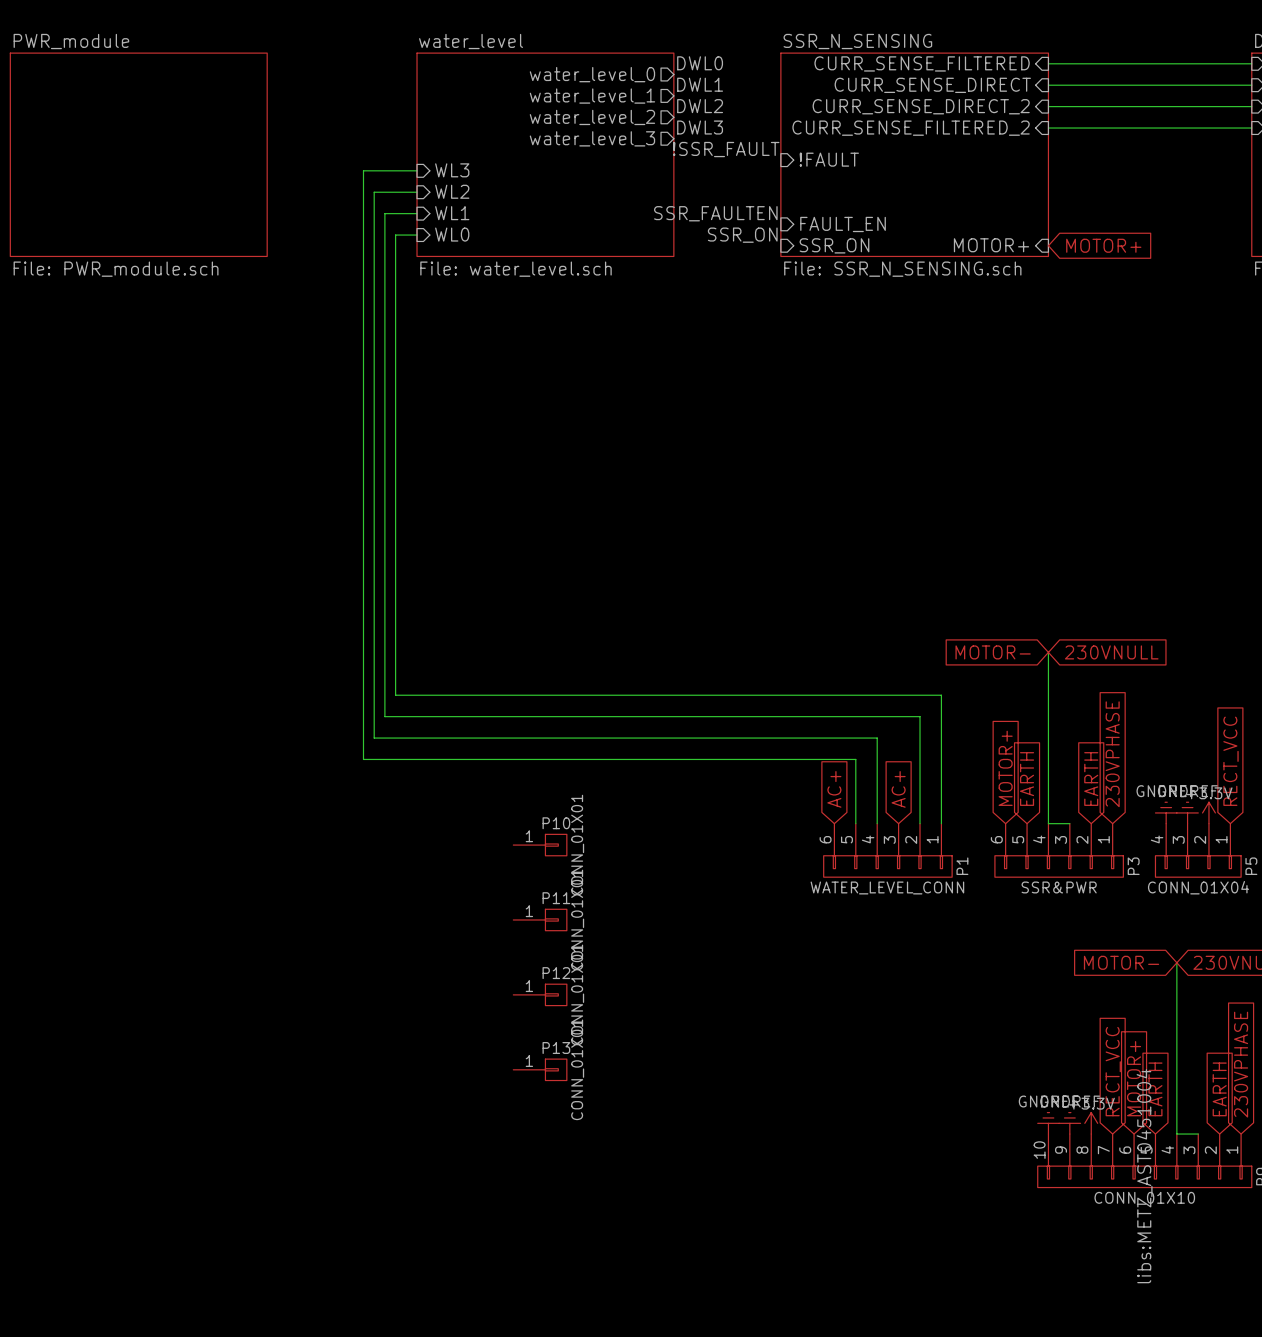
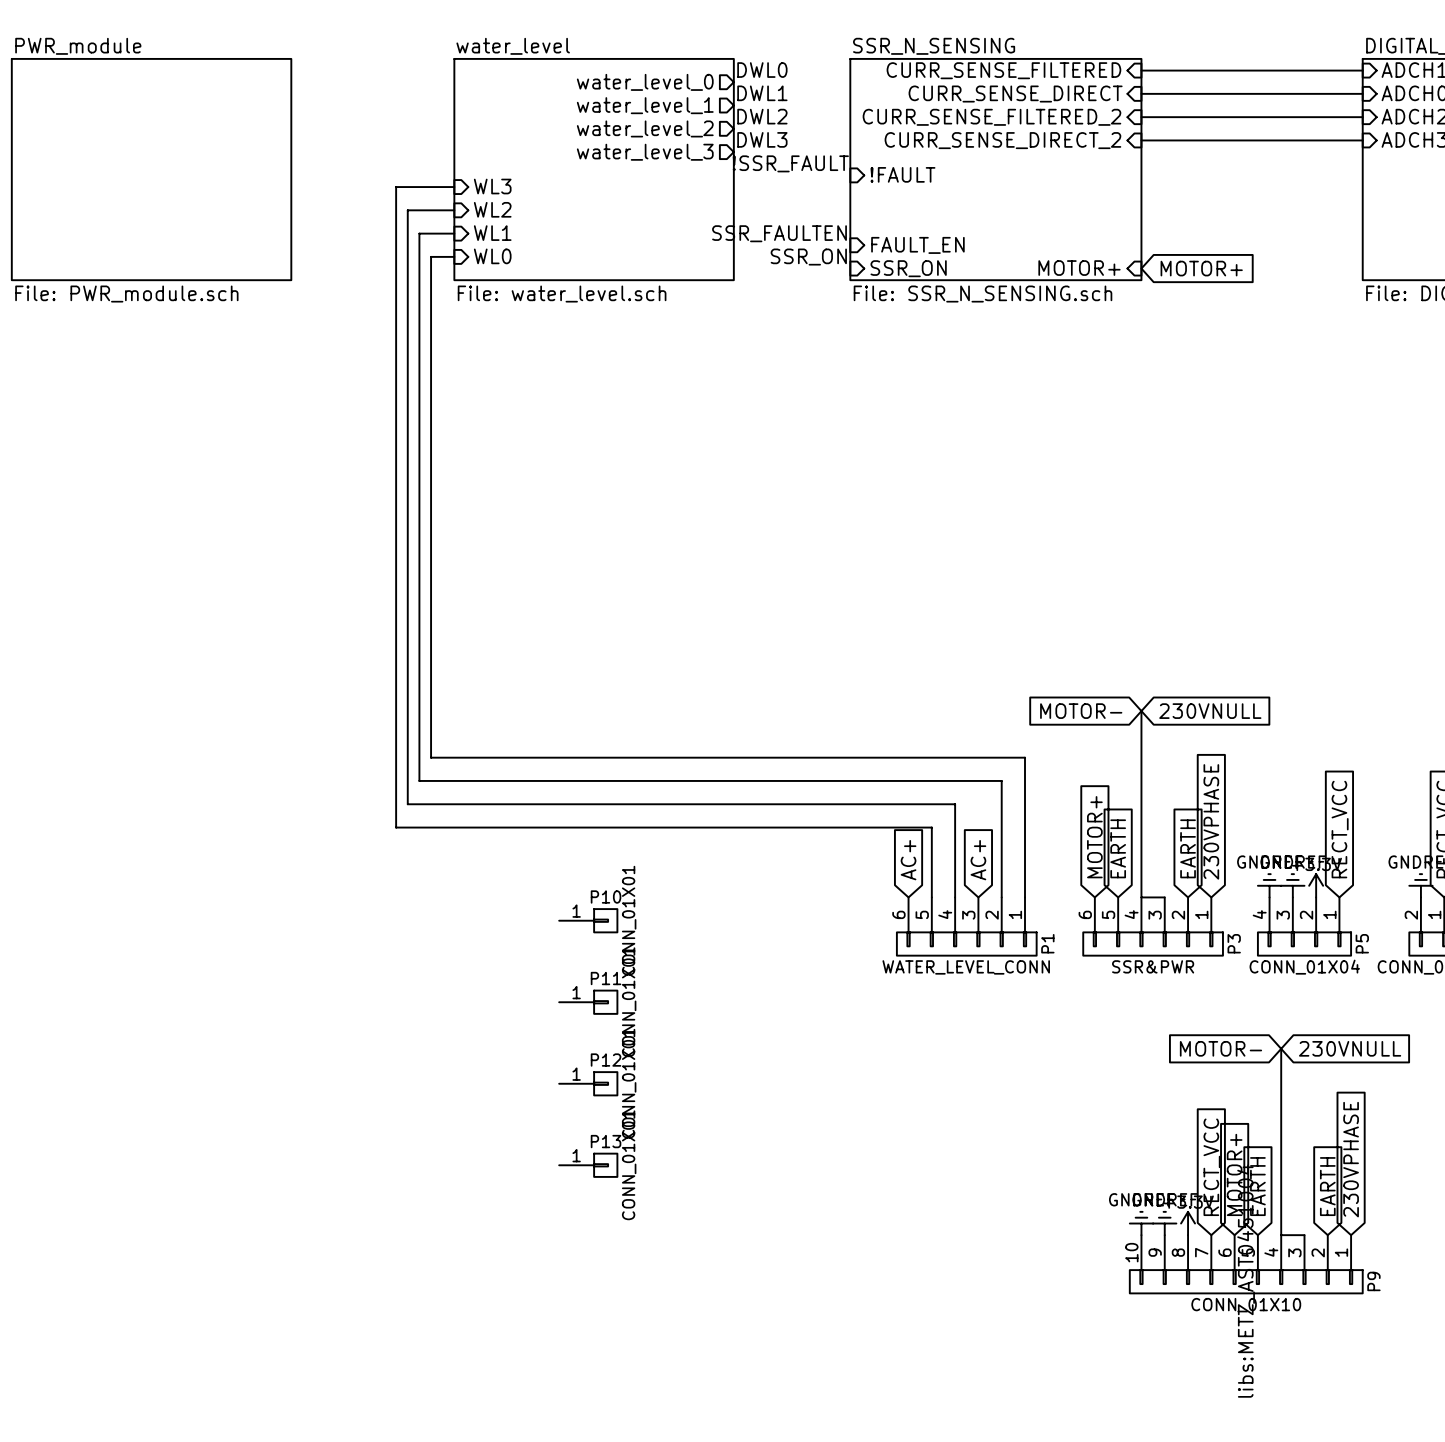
sheet pin: CURR_SENSE_DIRECT_2 (921, 106) -> CURR_SENSE_FILTERED_2 (991, 117)
sheet pin: CURR_SENSE_FILTERED_2 (911, 128) -> CURR_SENSE_DIRECT_2 (1002, 140)

